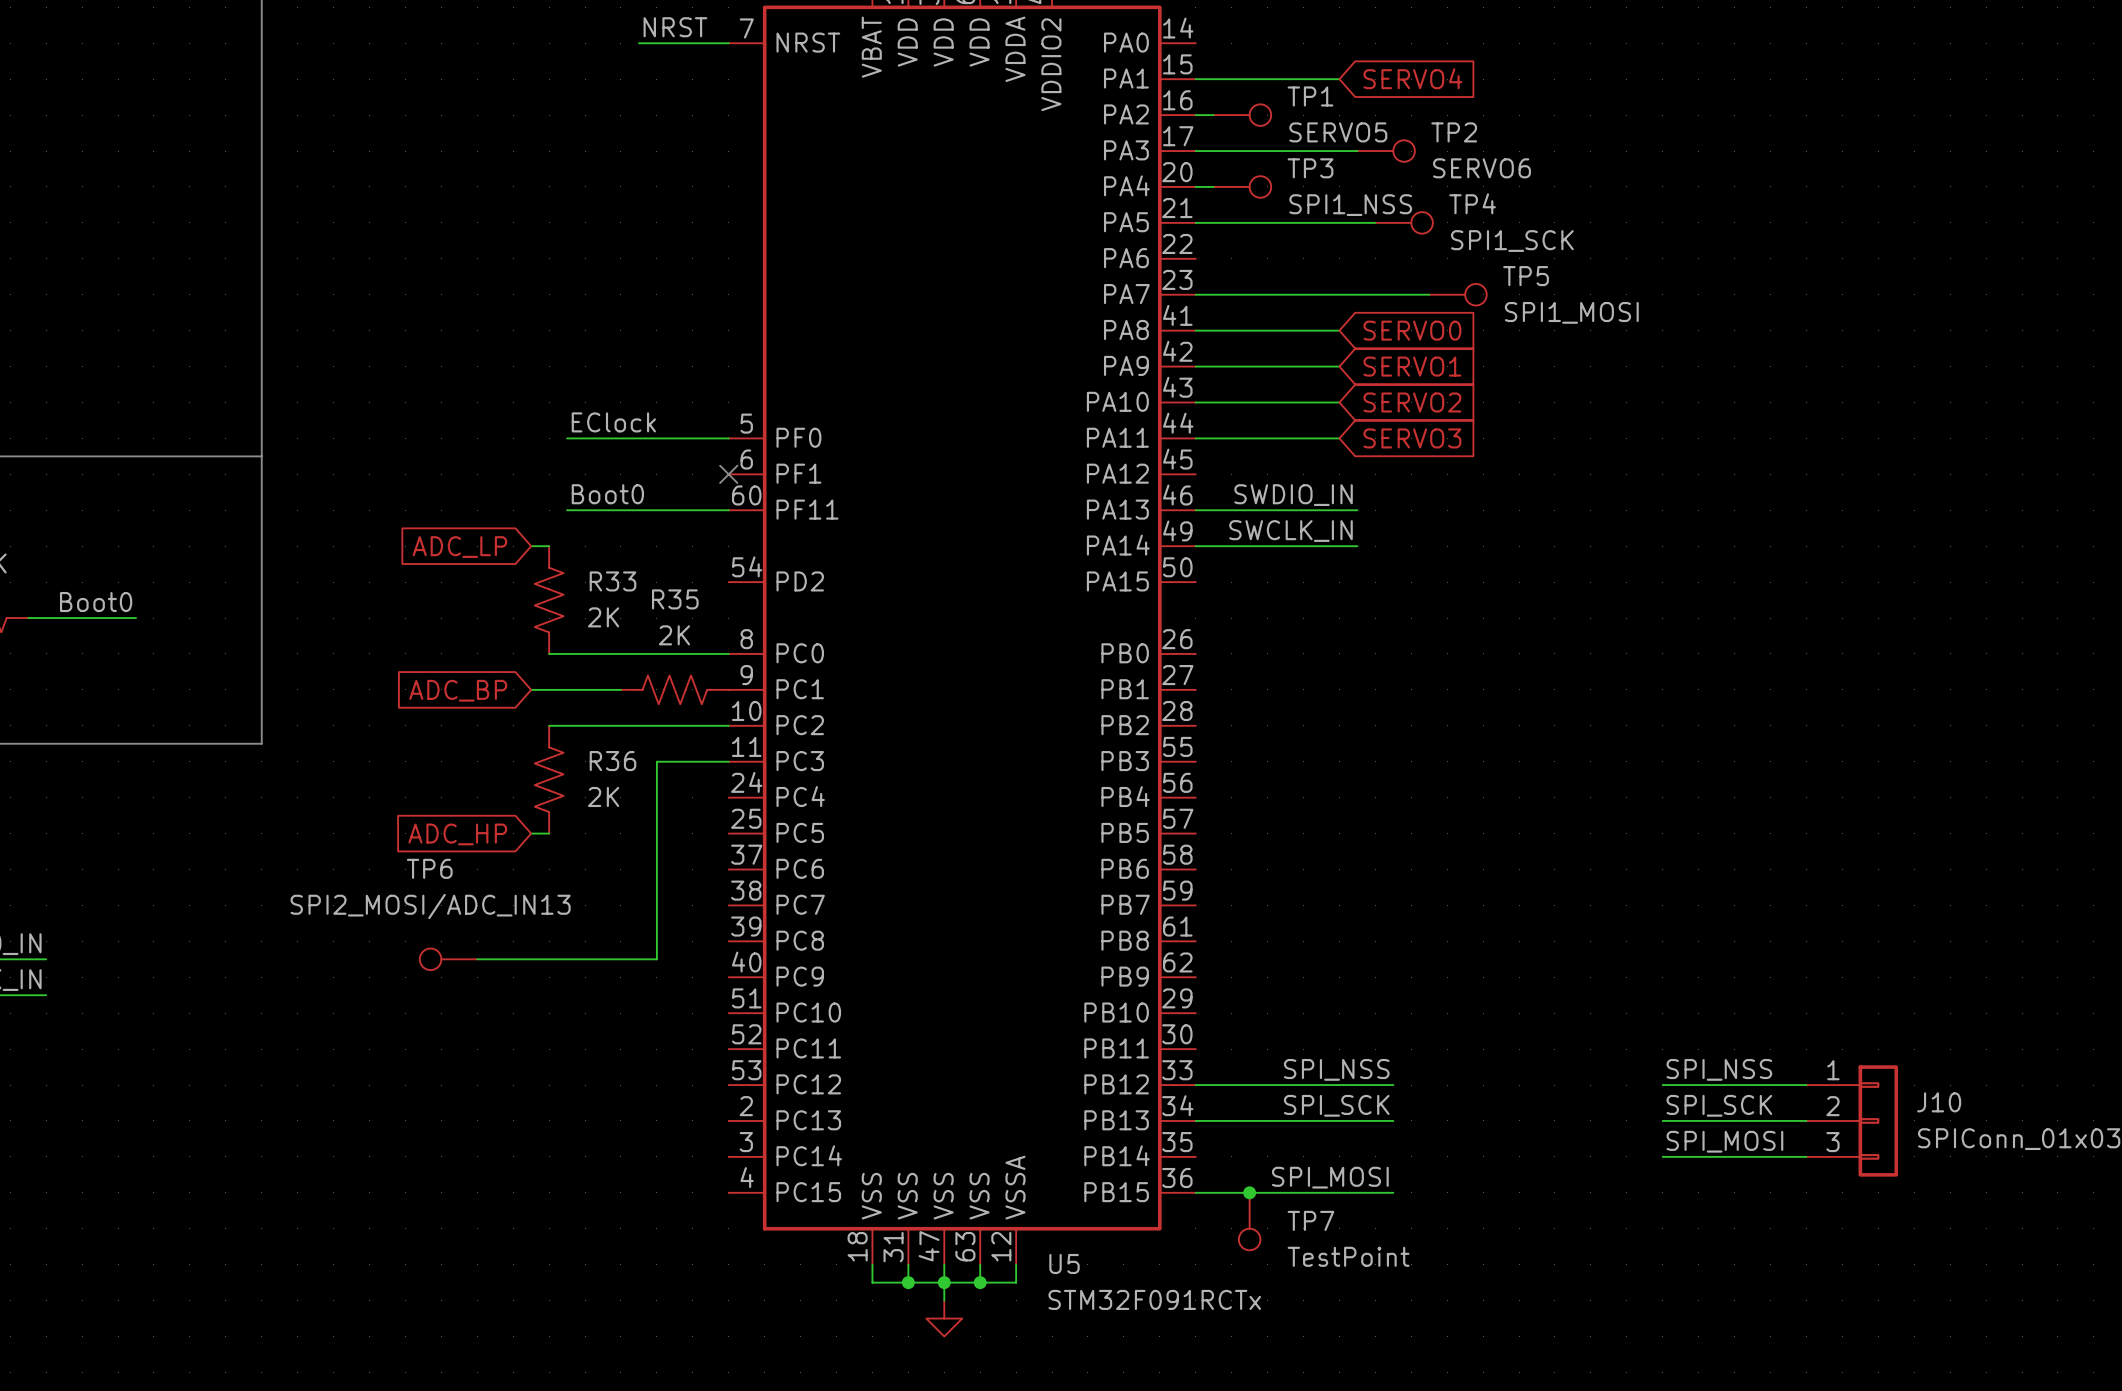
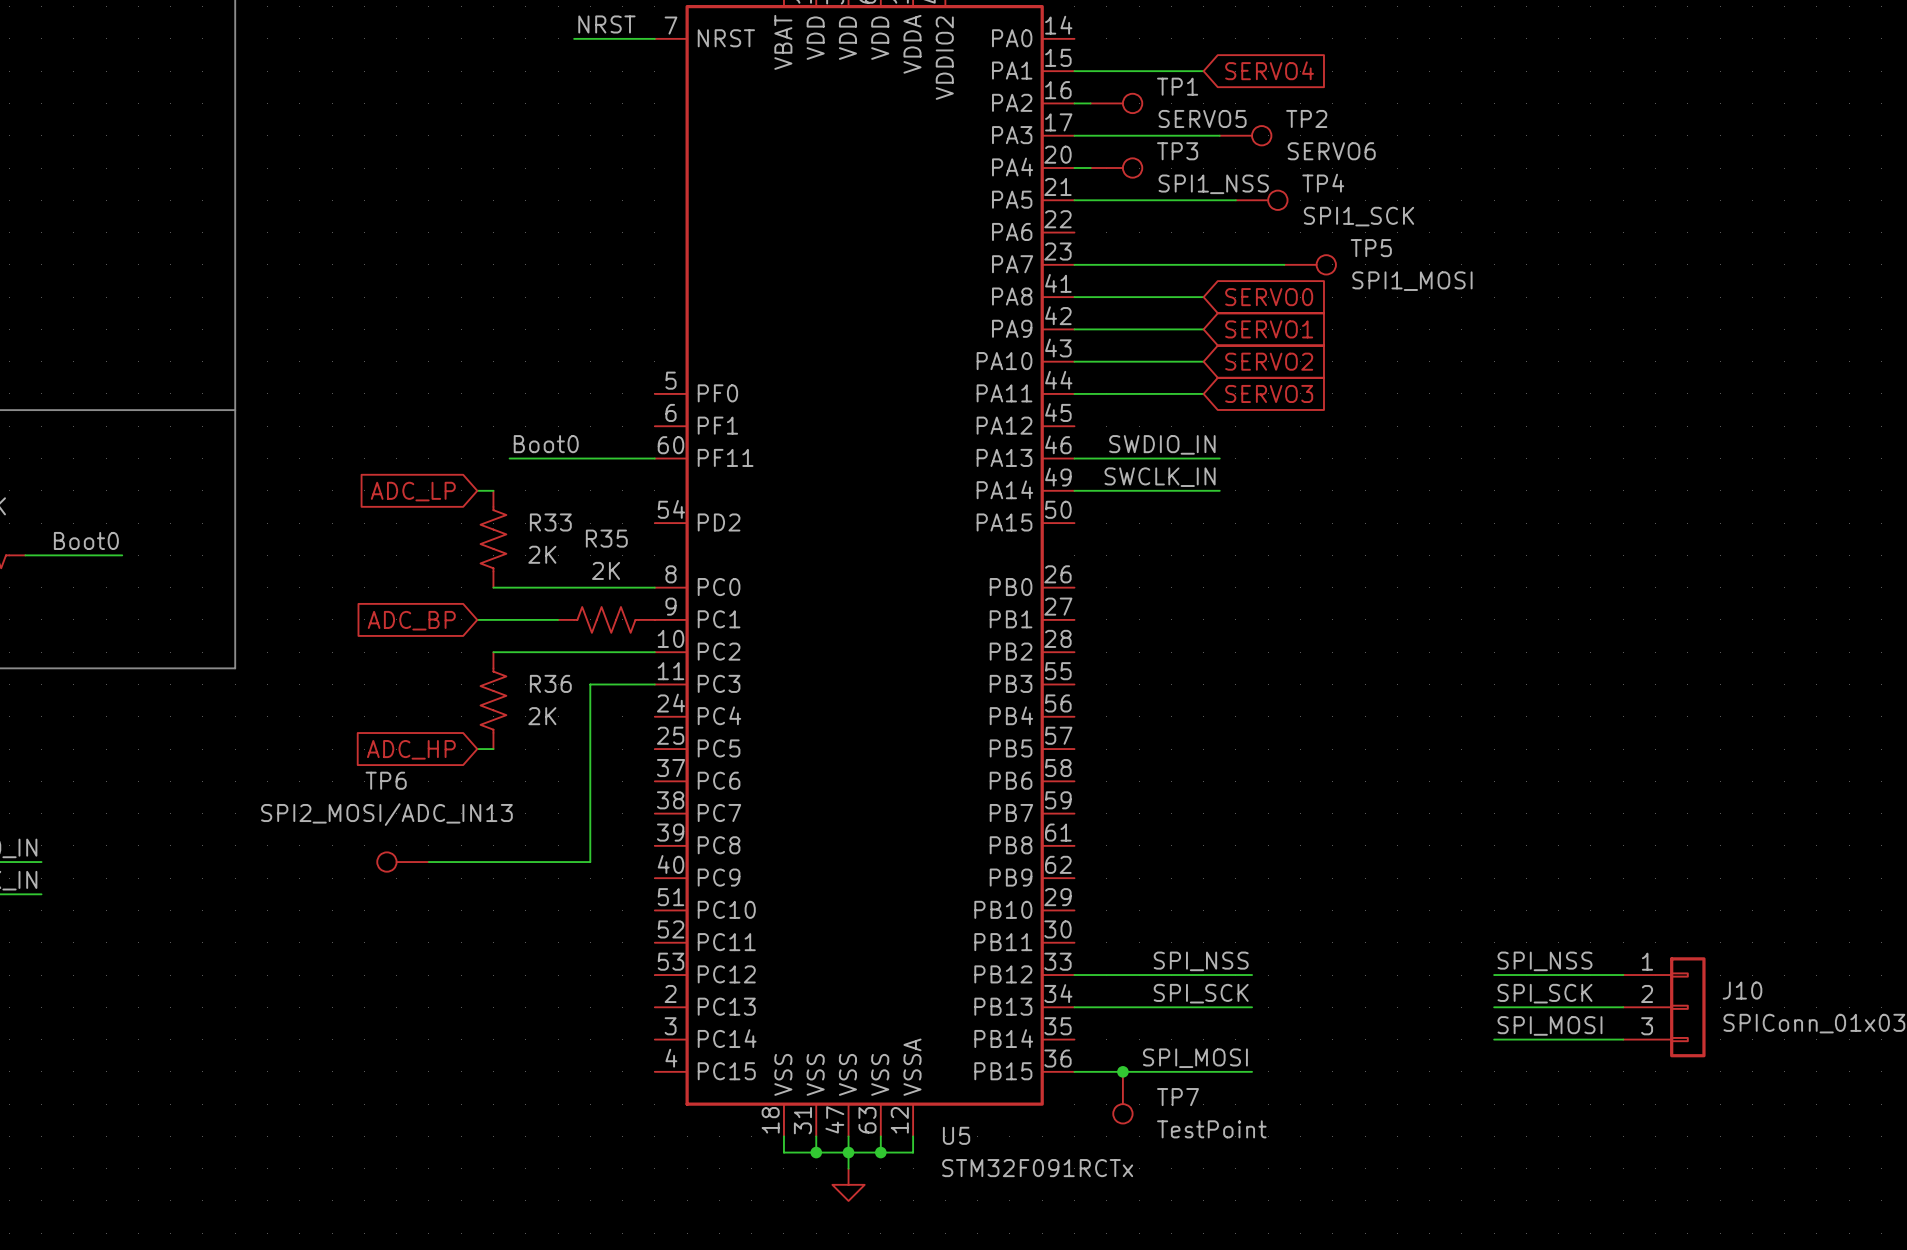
label: EClock (613, 422) -> none
wire: (567, 438) (728, 438) -> none
no-connect mark: (728, 474) -> none

